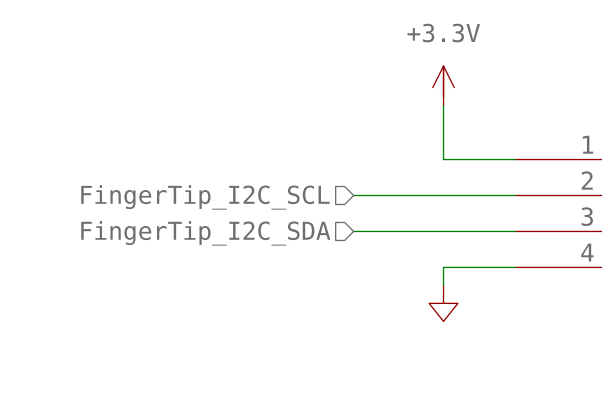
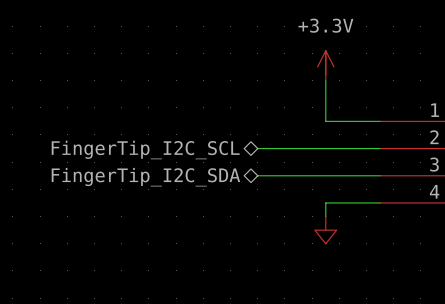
hierarchical label shape: input (205, 197) -> bidirectional (145, 149)
hierarchical label shape: input (205, 233) -> bidirectional (145, 177)

